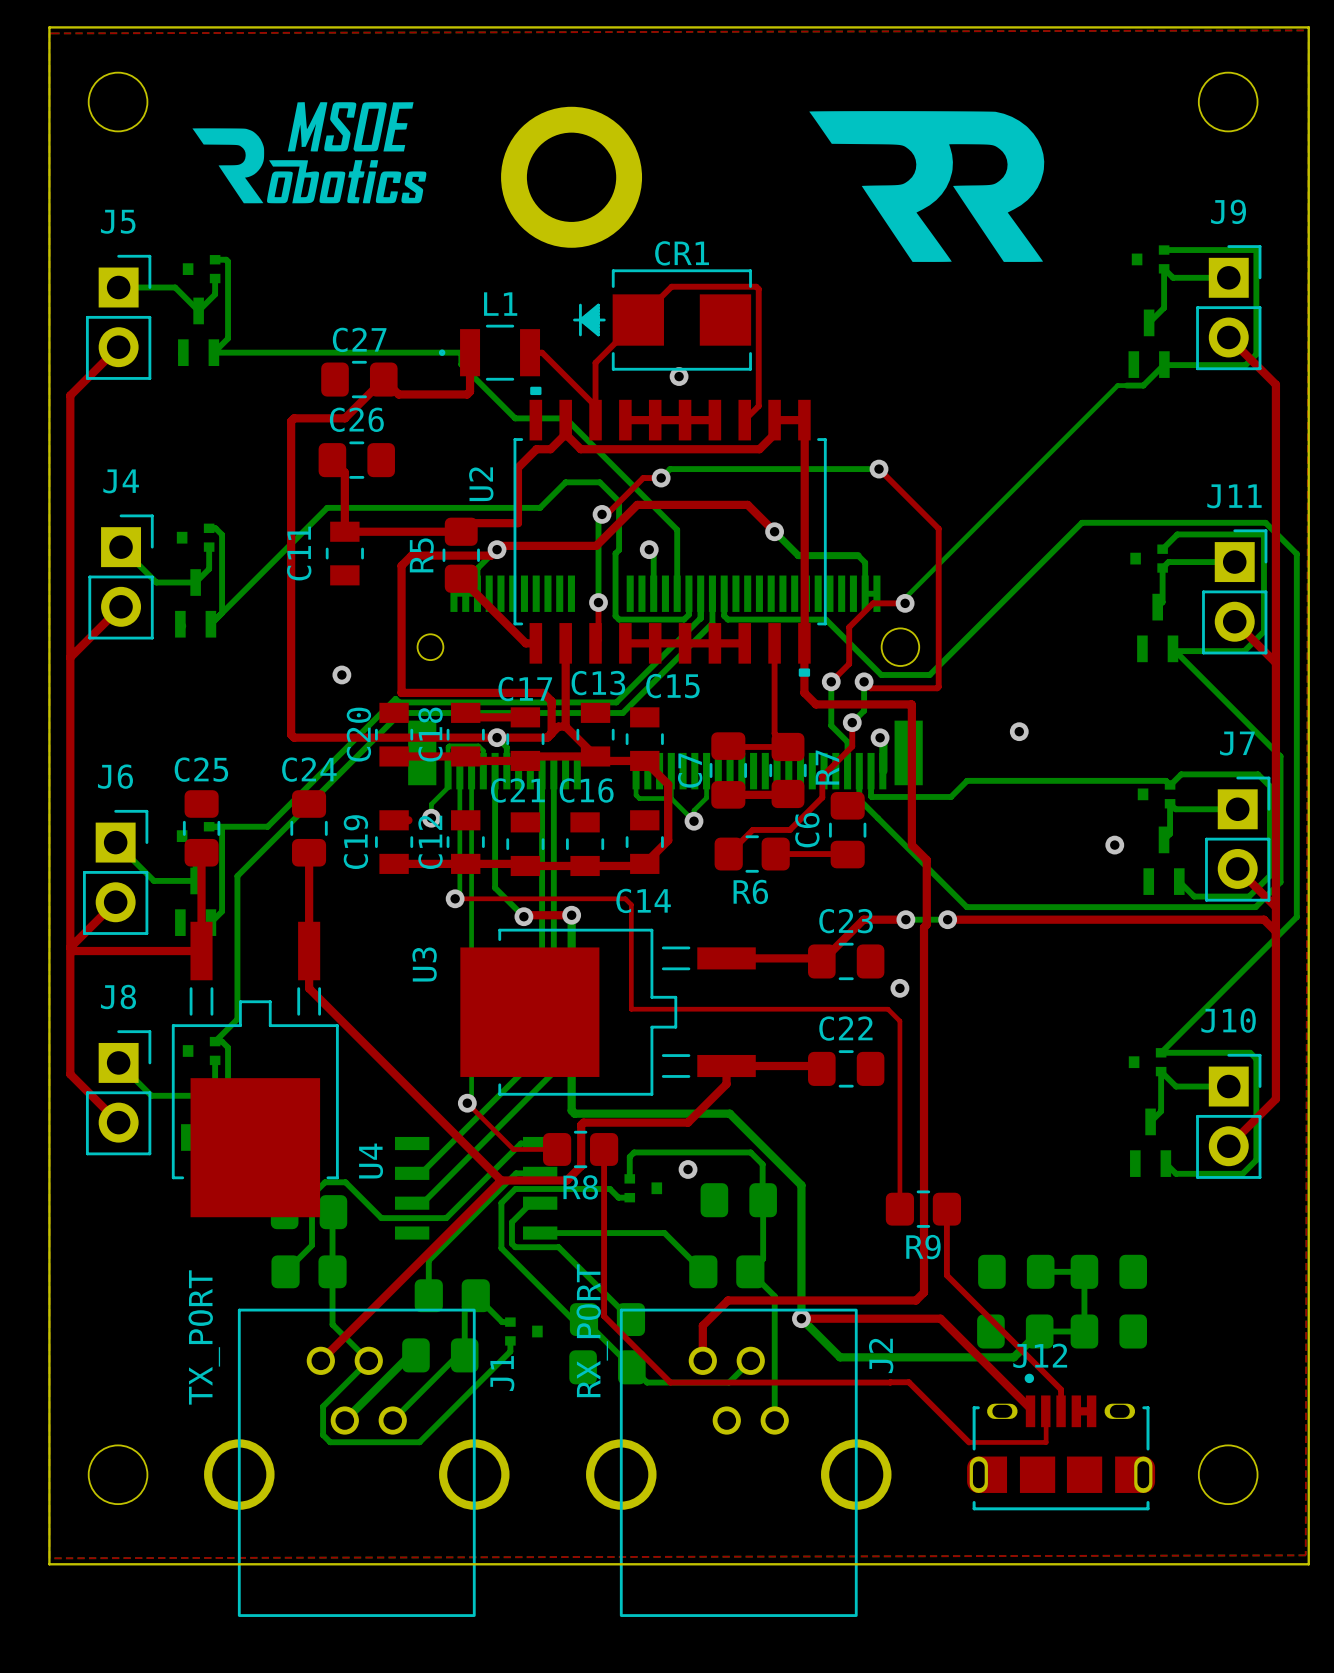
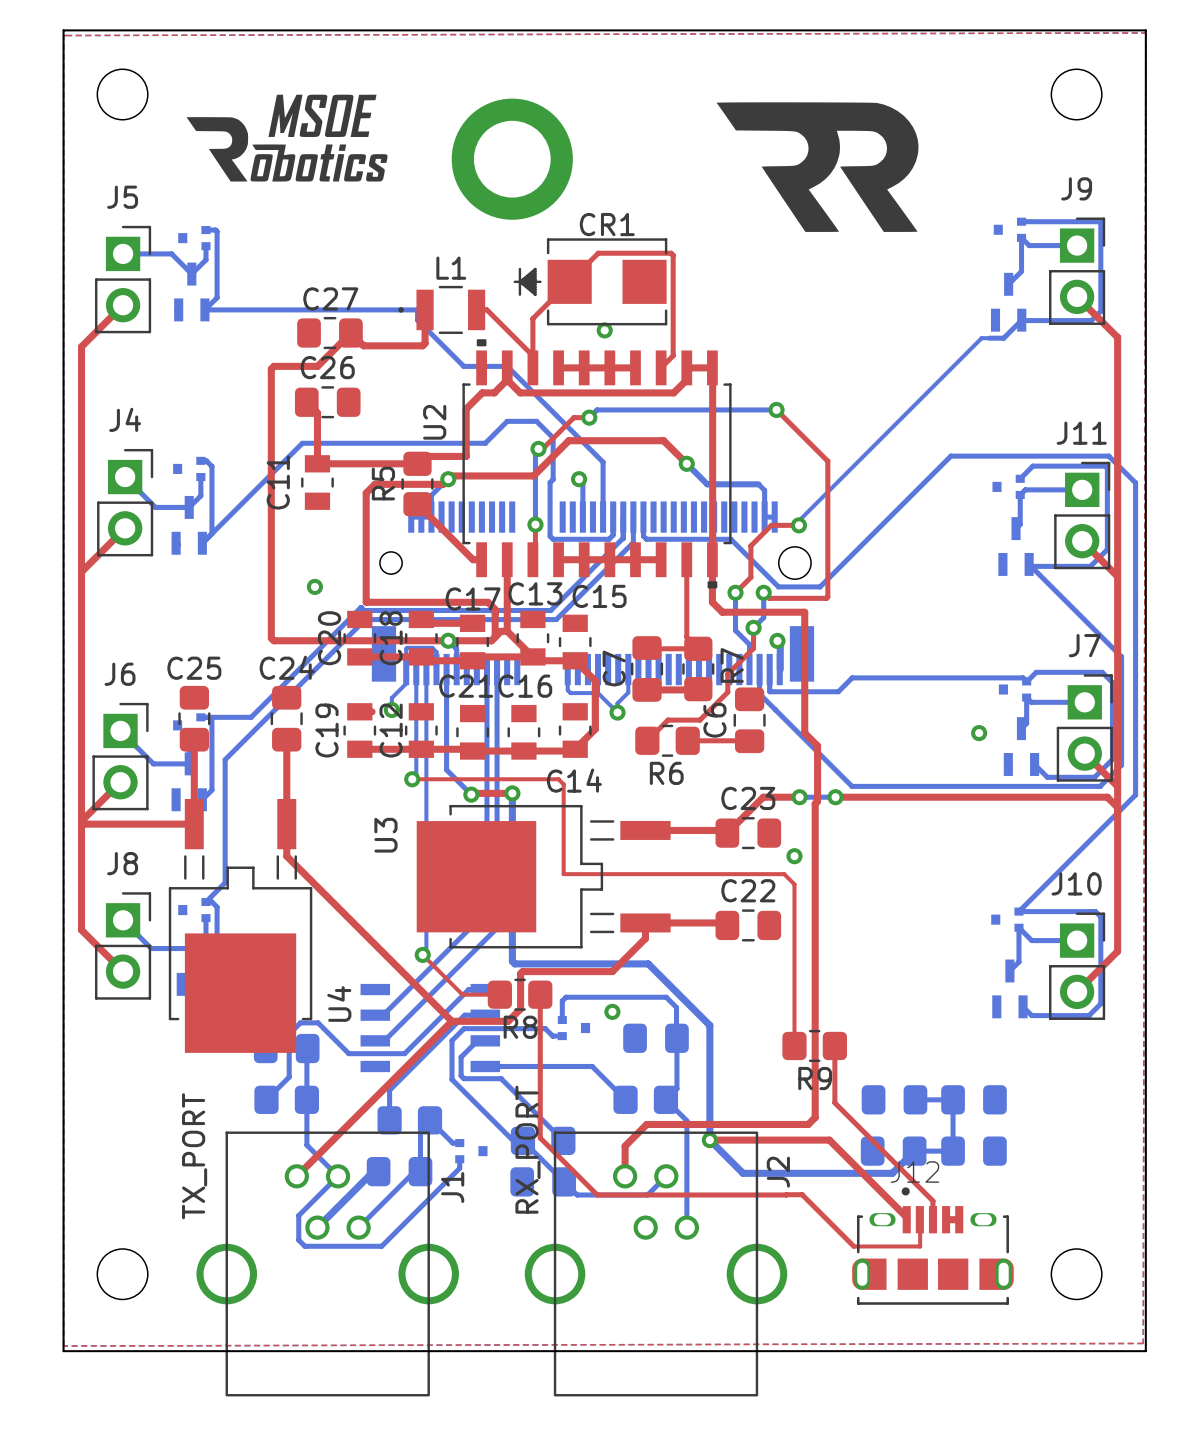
via: (1019, 731) -> none

